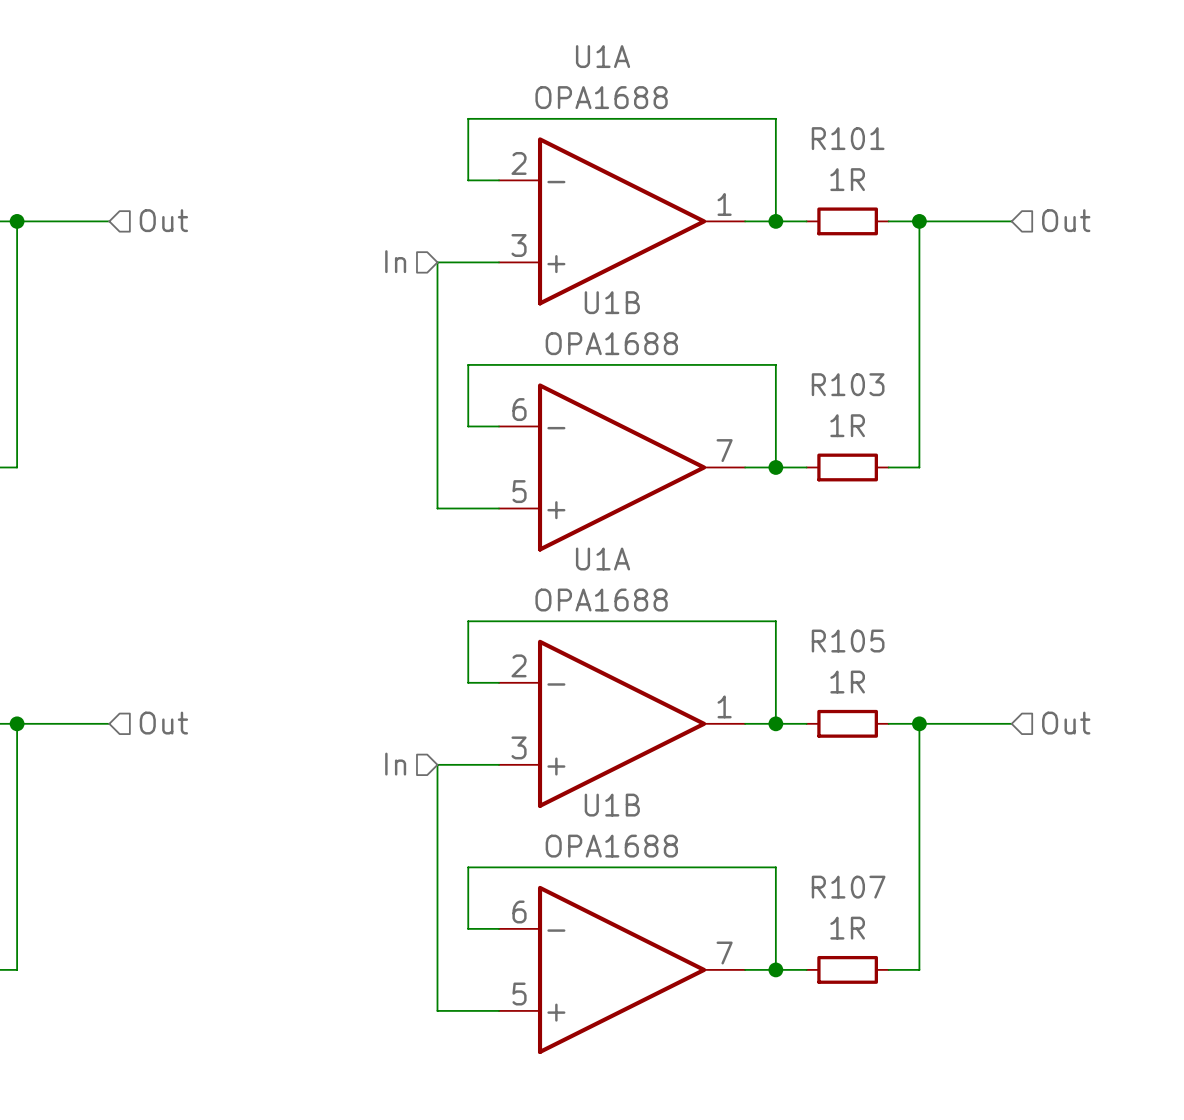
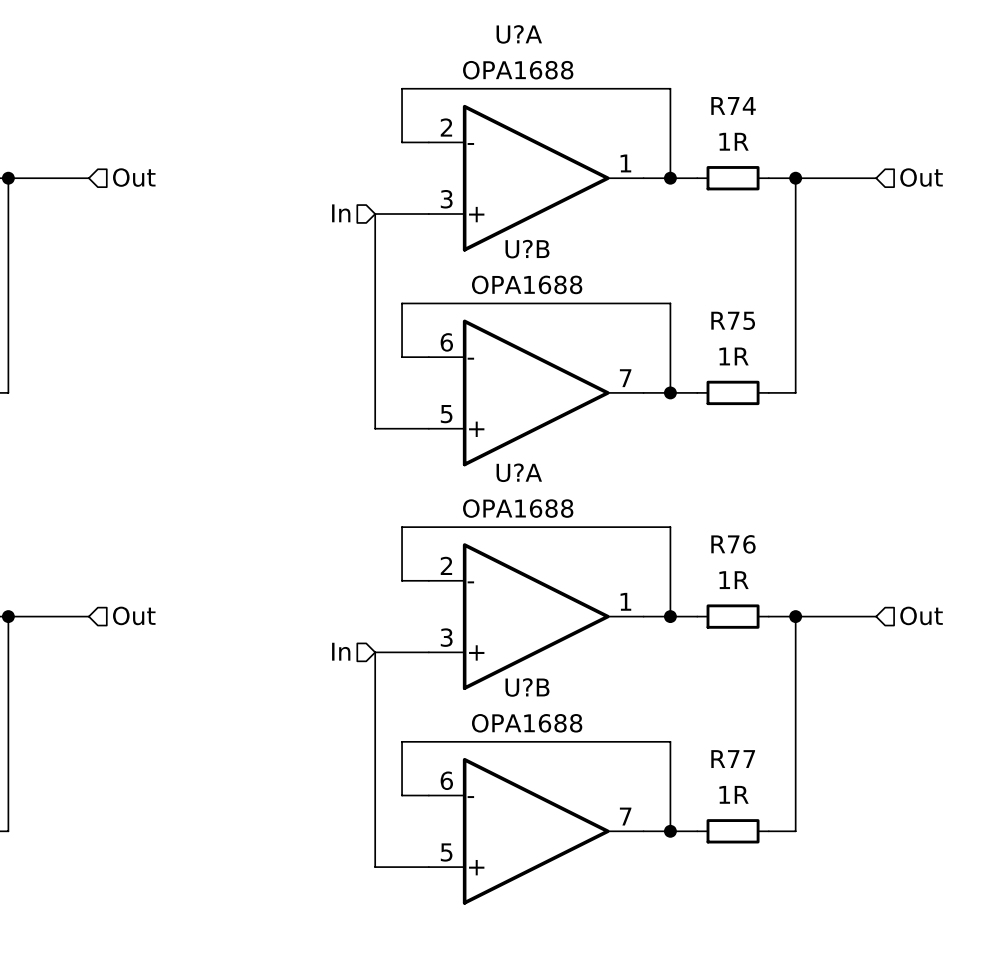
U1A name: U1A (603, 56) -> U?A (519, 34)
R101 name: R101 (848, 138) -> R74 (733, 105)
U1B name: U1B (612, 302) -> U?B (527, 249)
R103 name: R103 (848, 384) -> R75 (733, 320)
U1A name: U1A (603, 559) -> U?A (519, 472)
R105 name: R105 (848, 641) -> R76 (733, 544)
U1B name: U1B (612, 805) -> U?B (527, 687)
R107 name: R107 (848, 887) -> R77 (733, 759)

